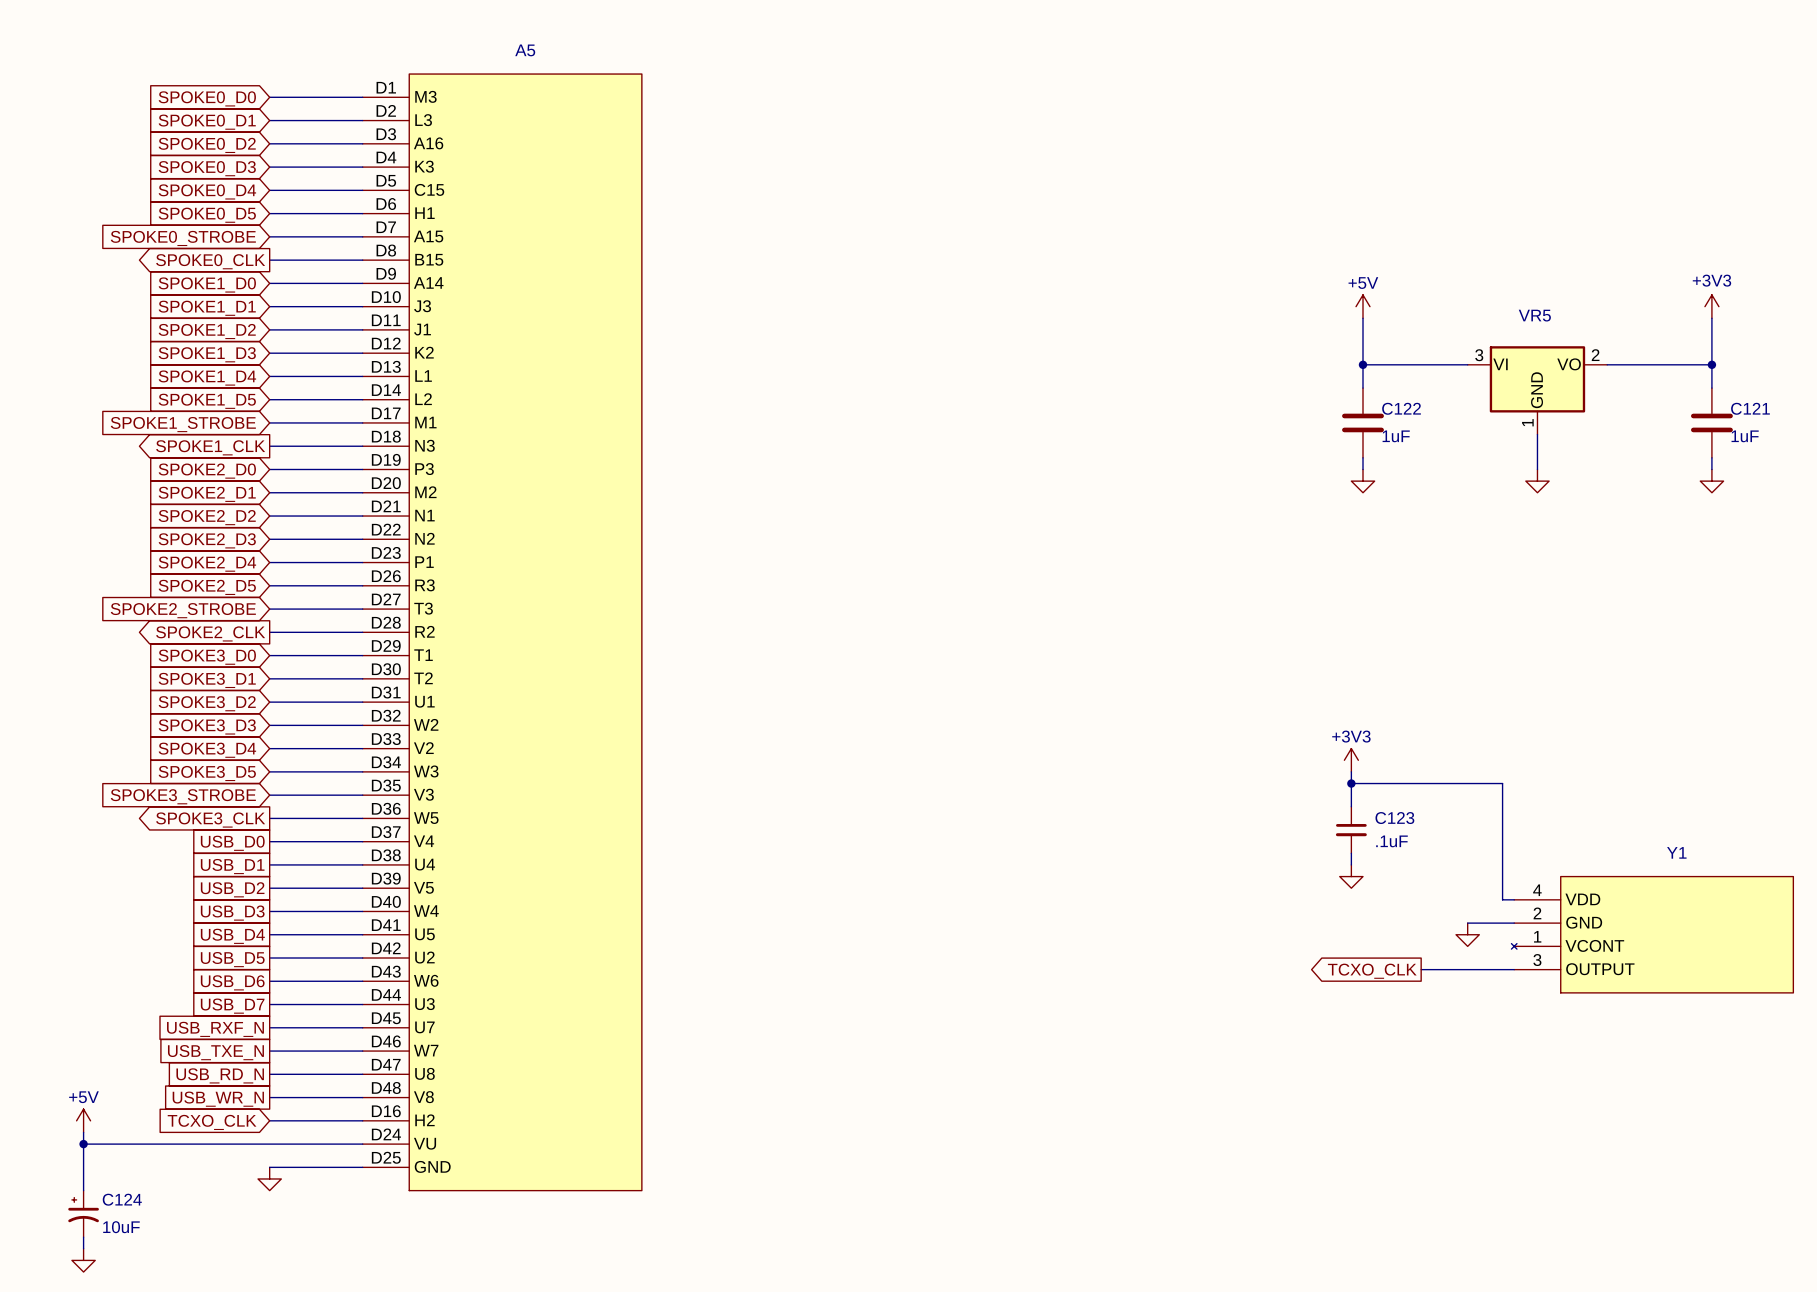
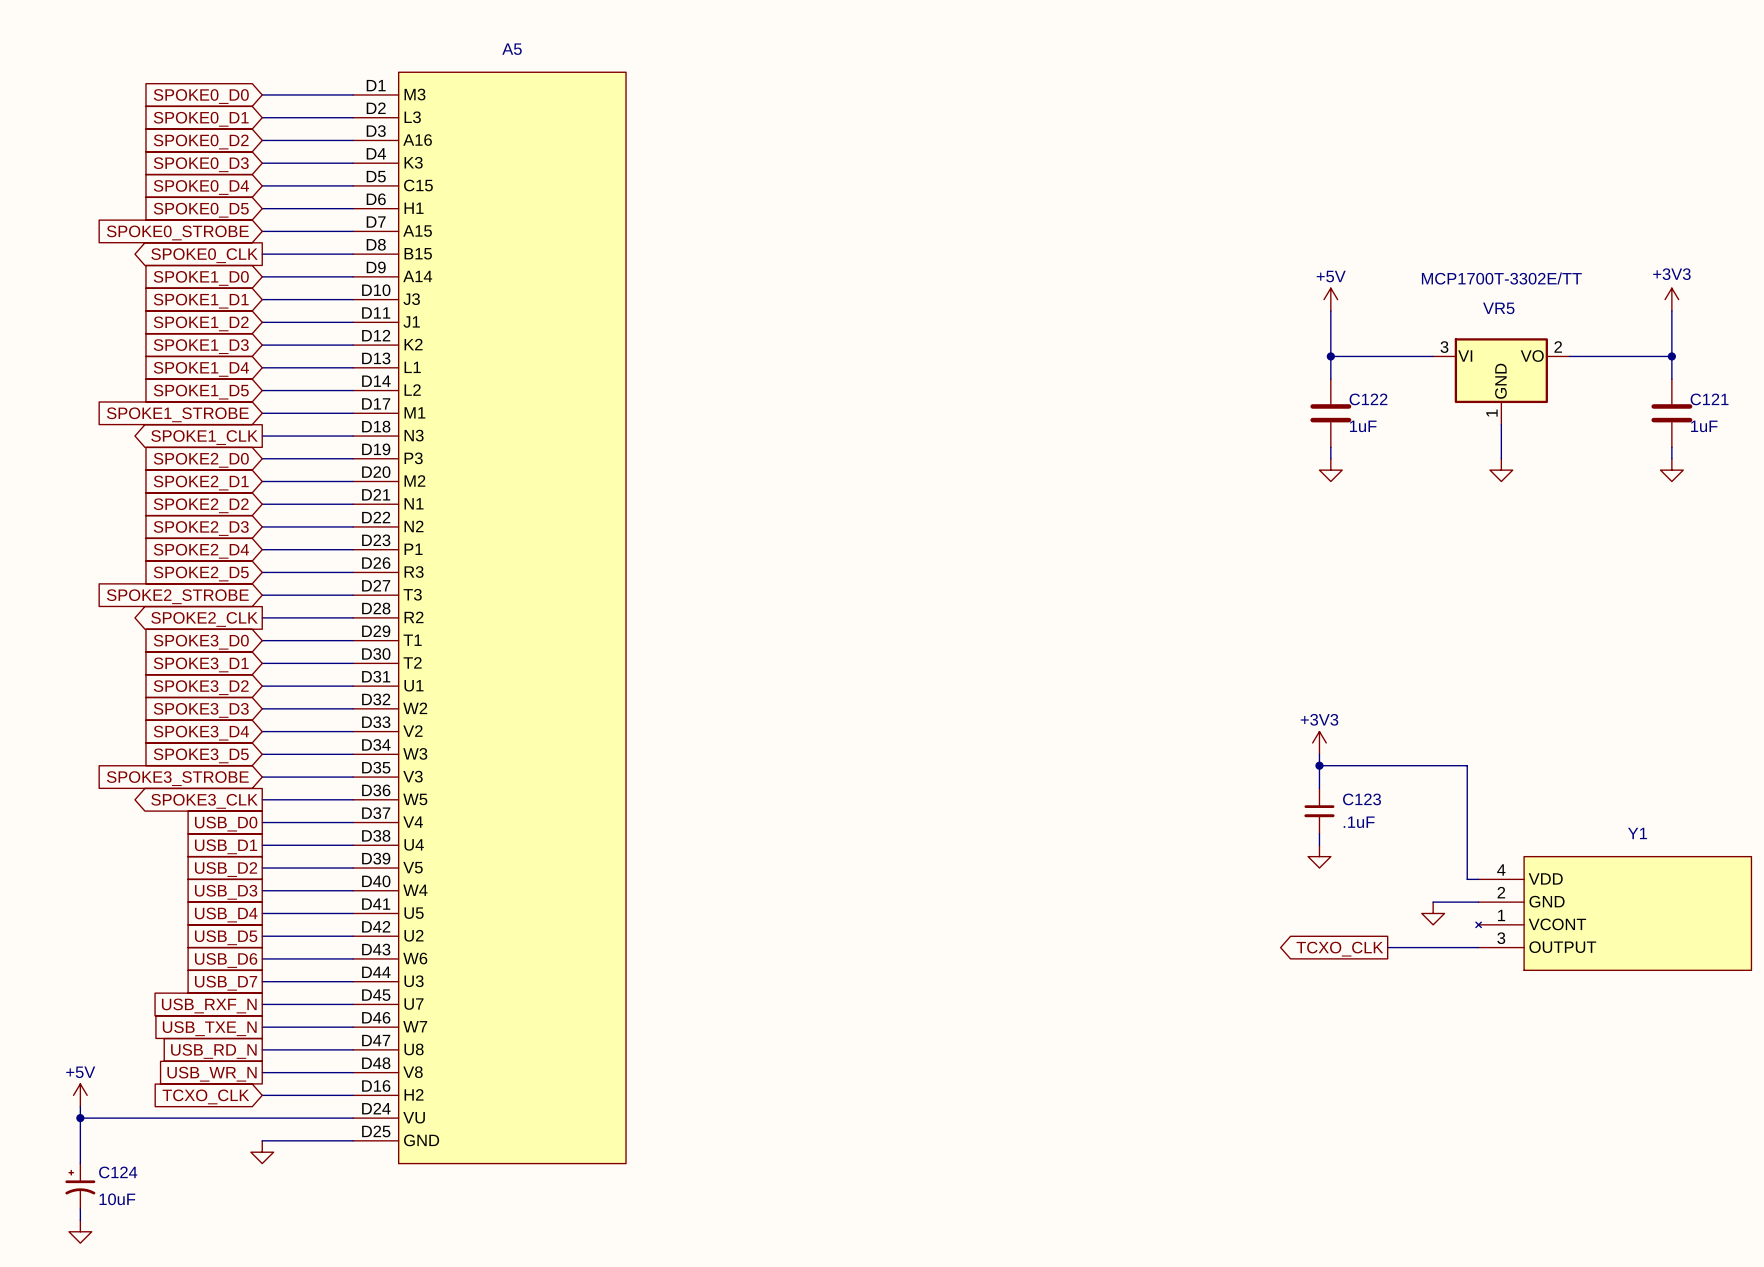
VR5 value: none -> MCP1700T-3302E/TT (1501, 278)

